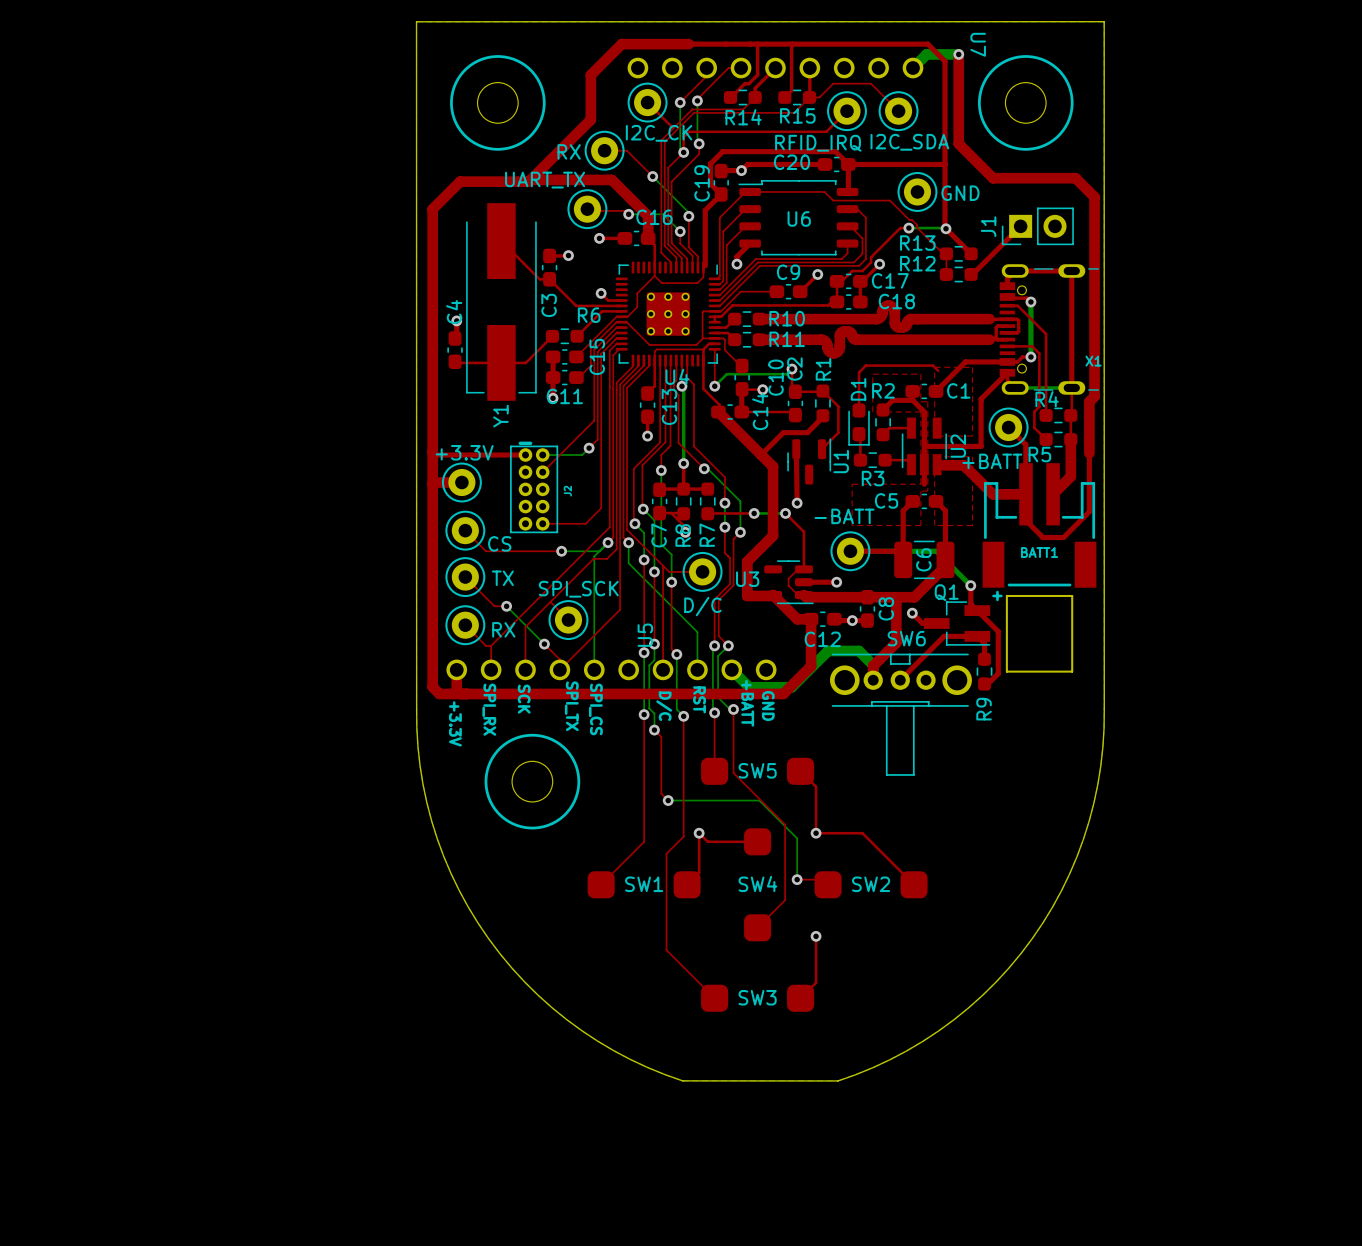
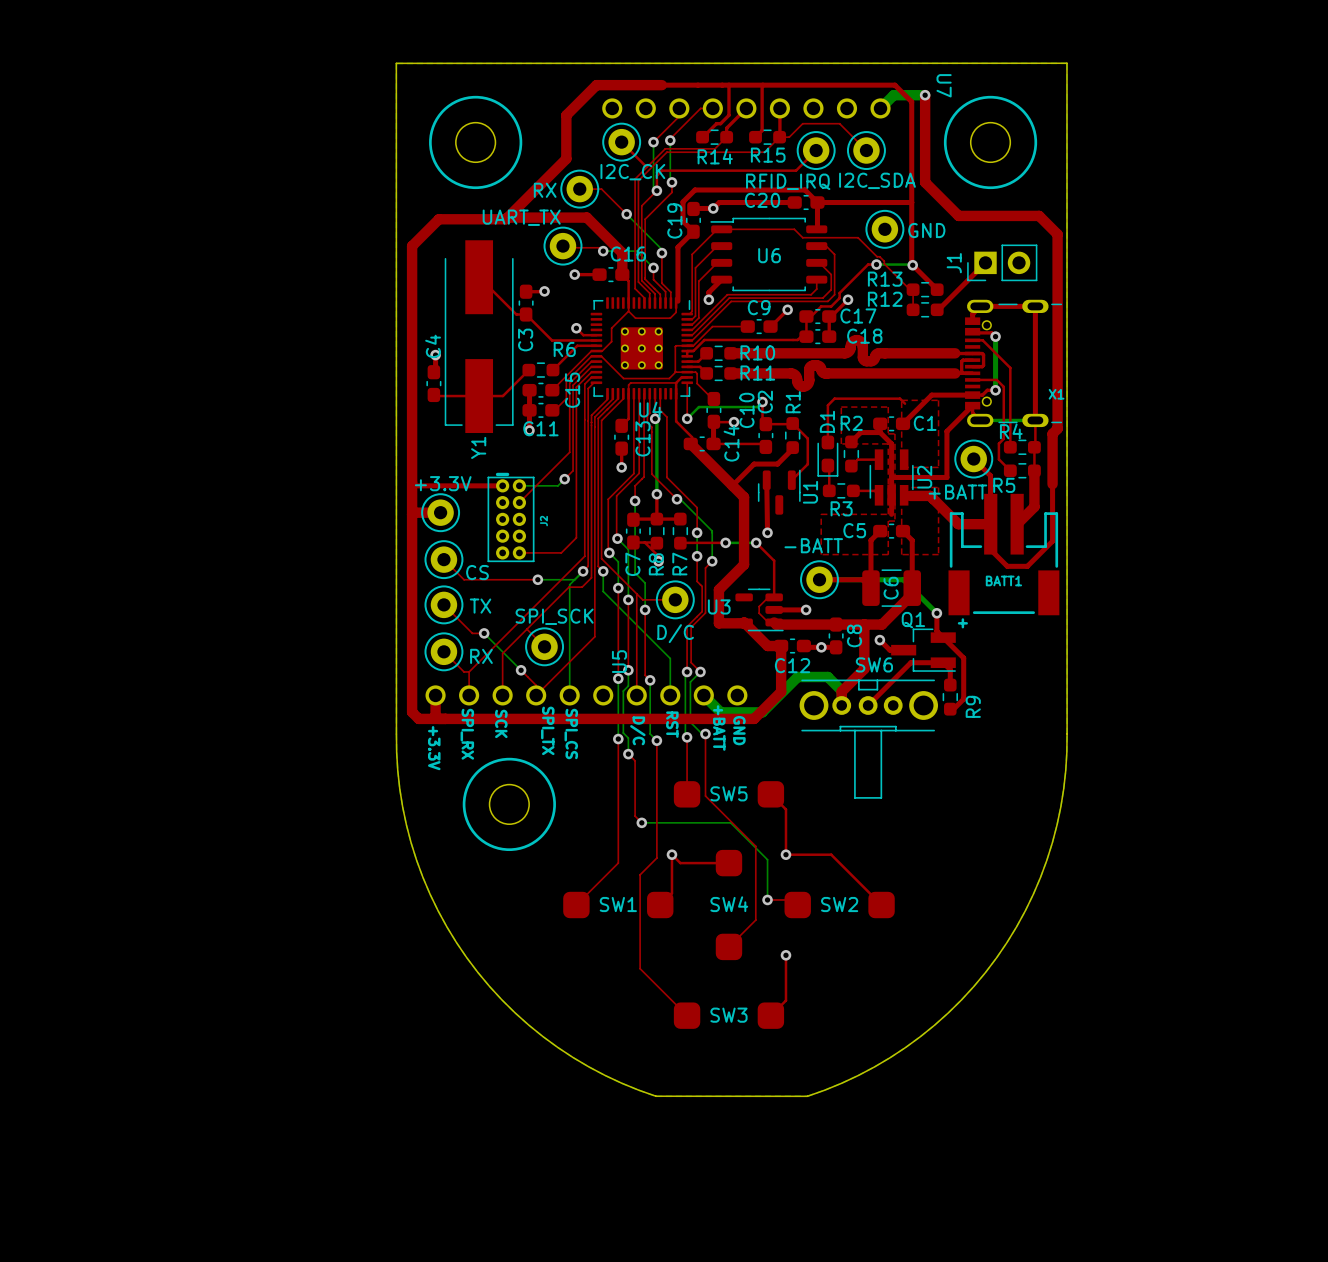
board edge: (1006, 595) (1072, 595) (1072, 671) (1006, 671) (1006, 595) -> none
R9 name position: R9 (984, 709) -> R9 (973, 706)

